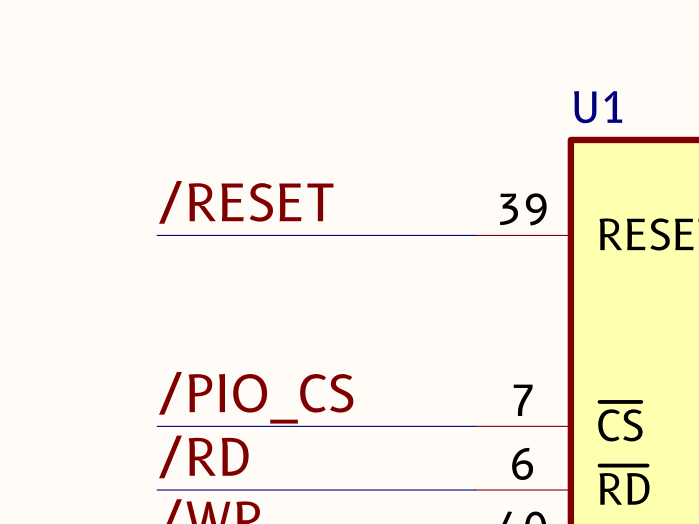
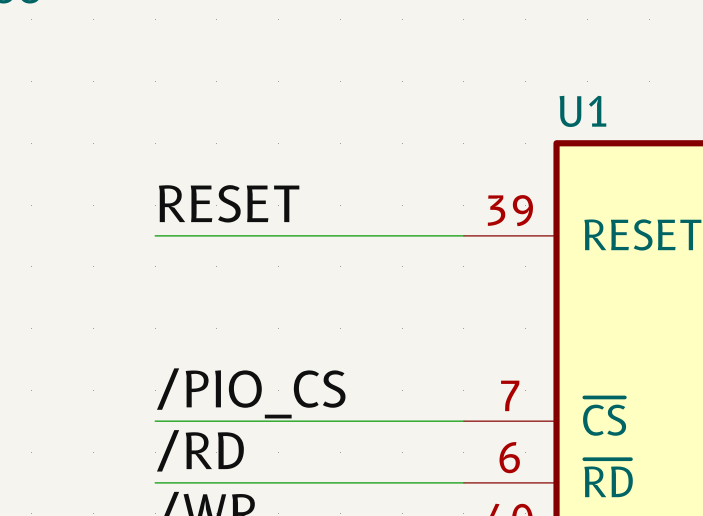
label: /RESET (246, 202) -> RESET (229, 203)

